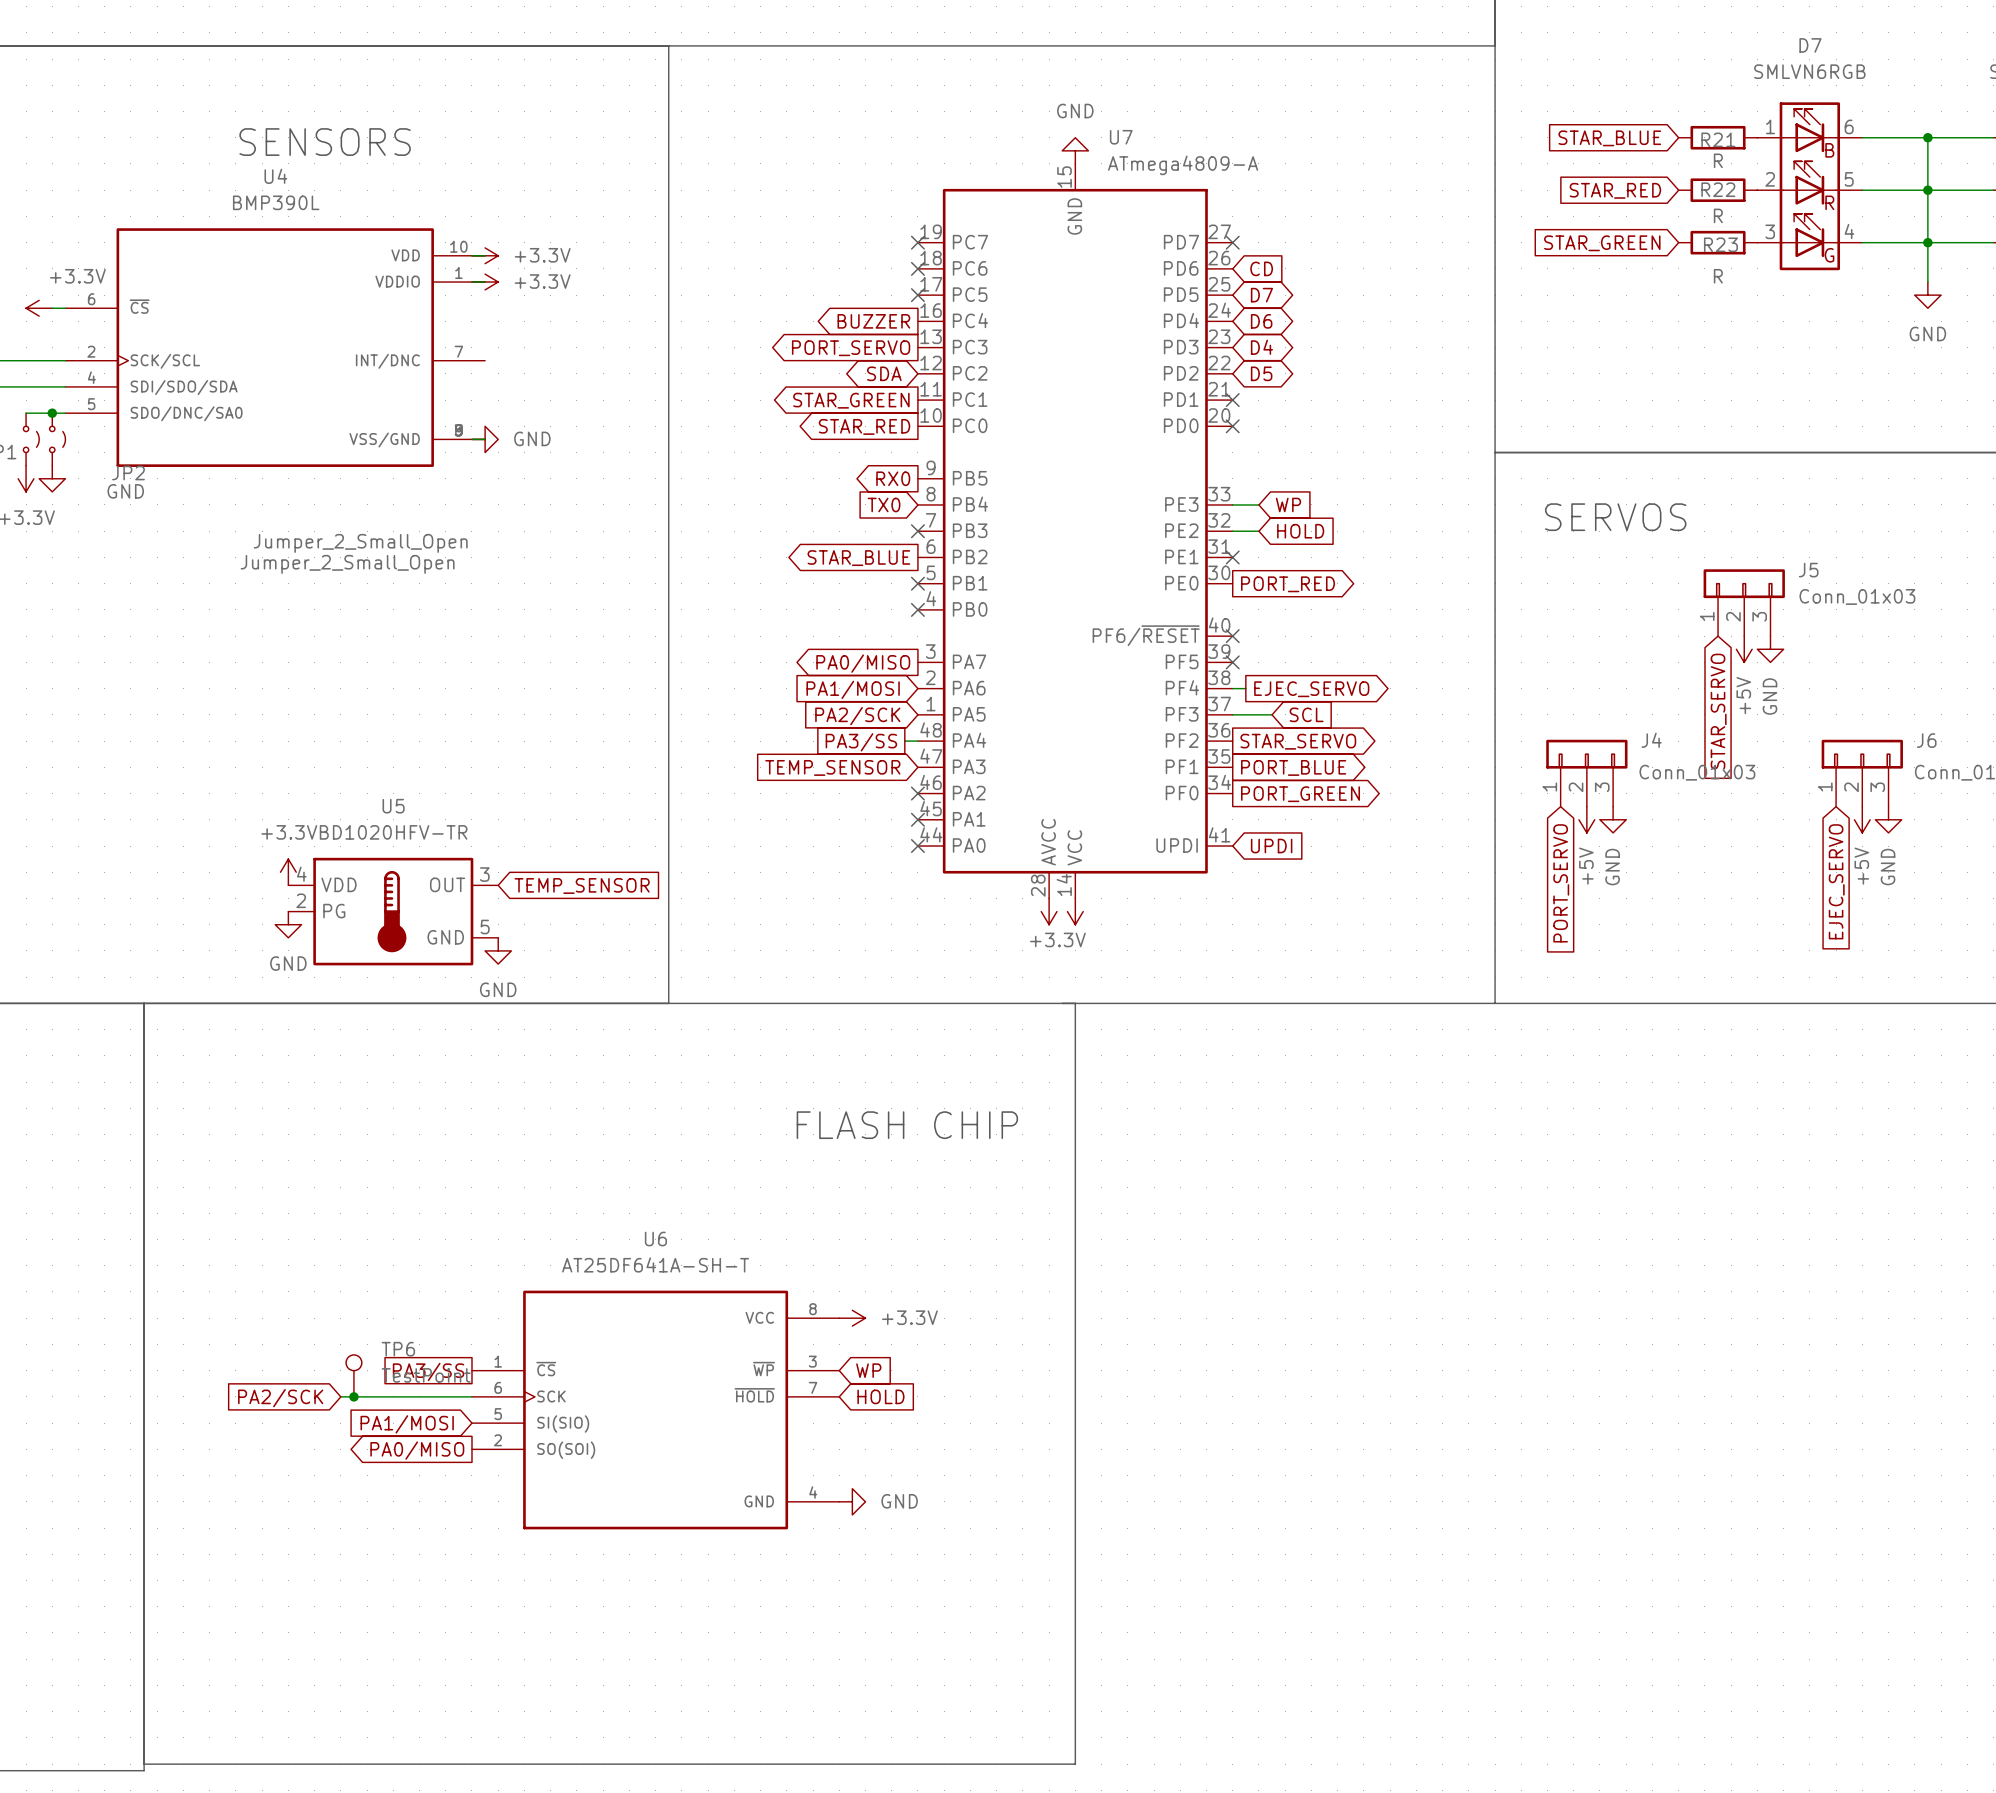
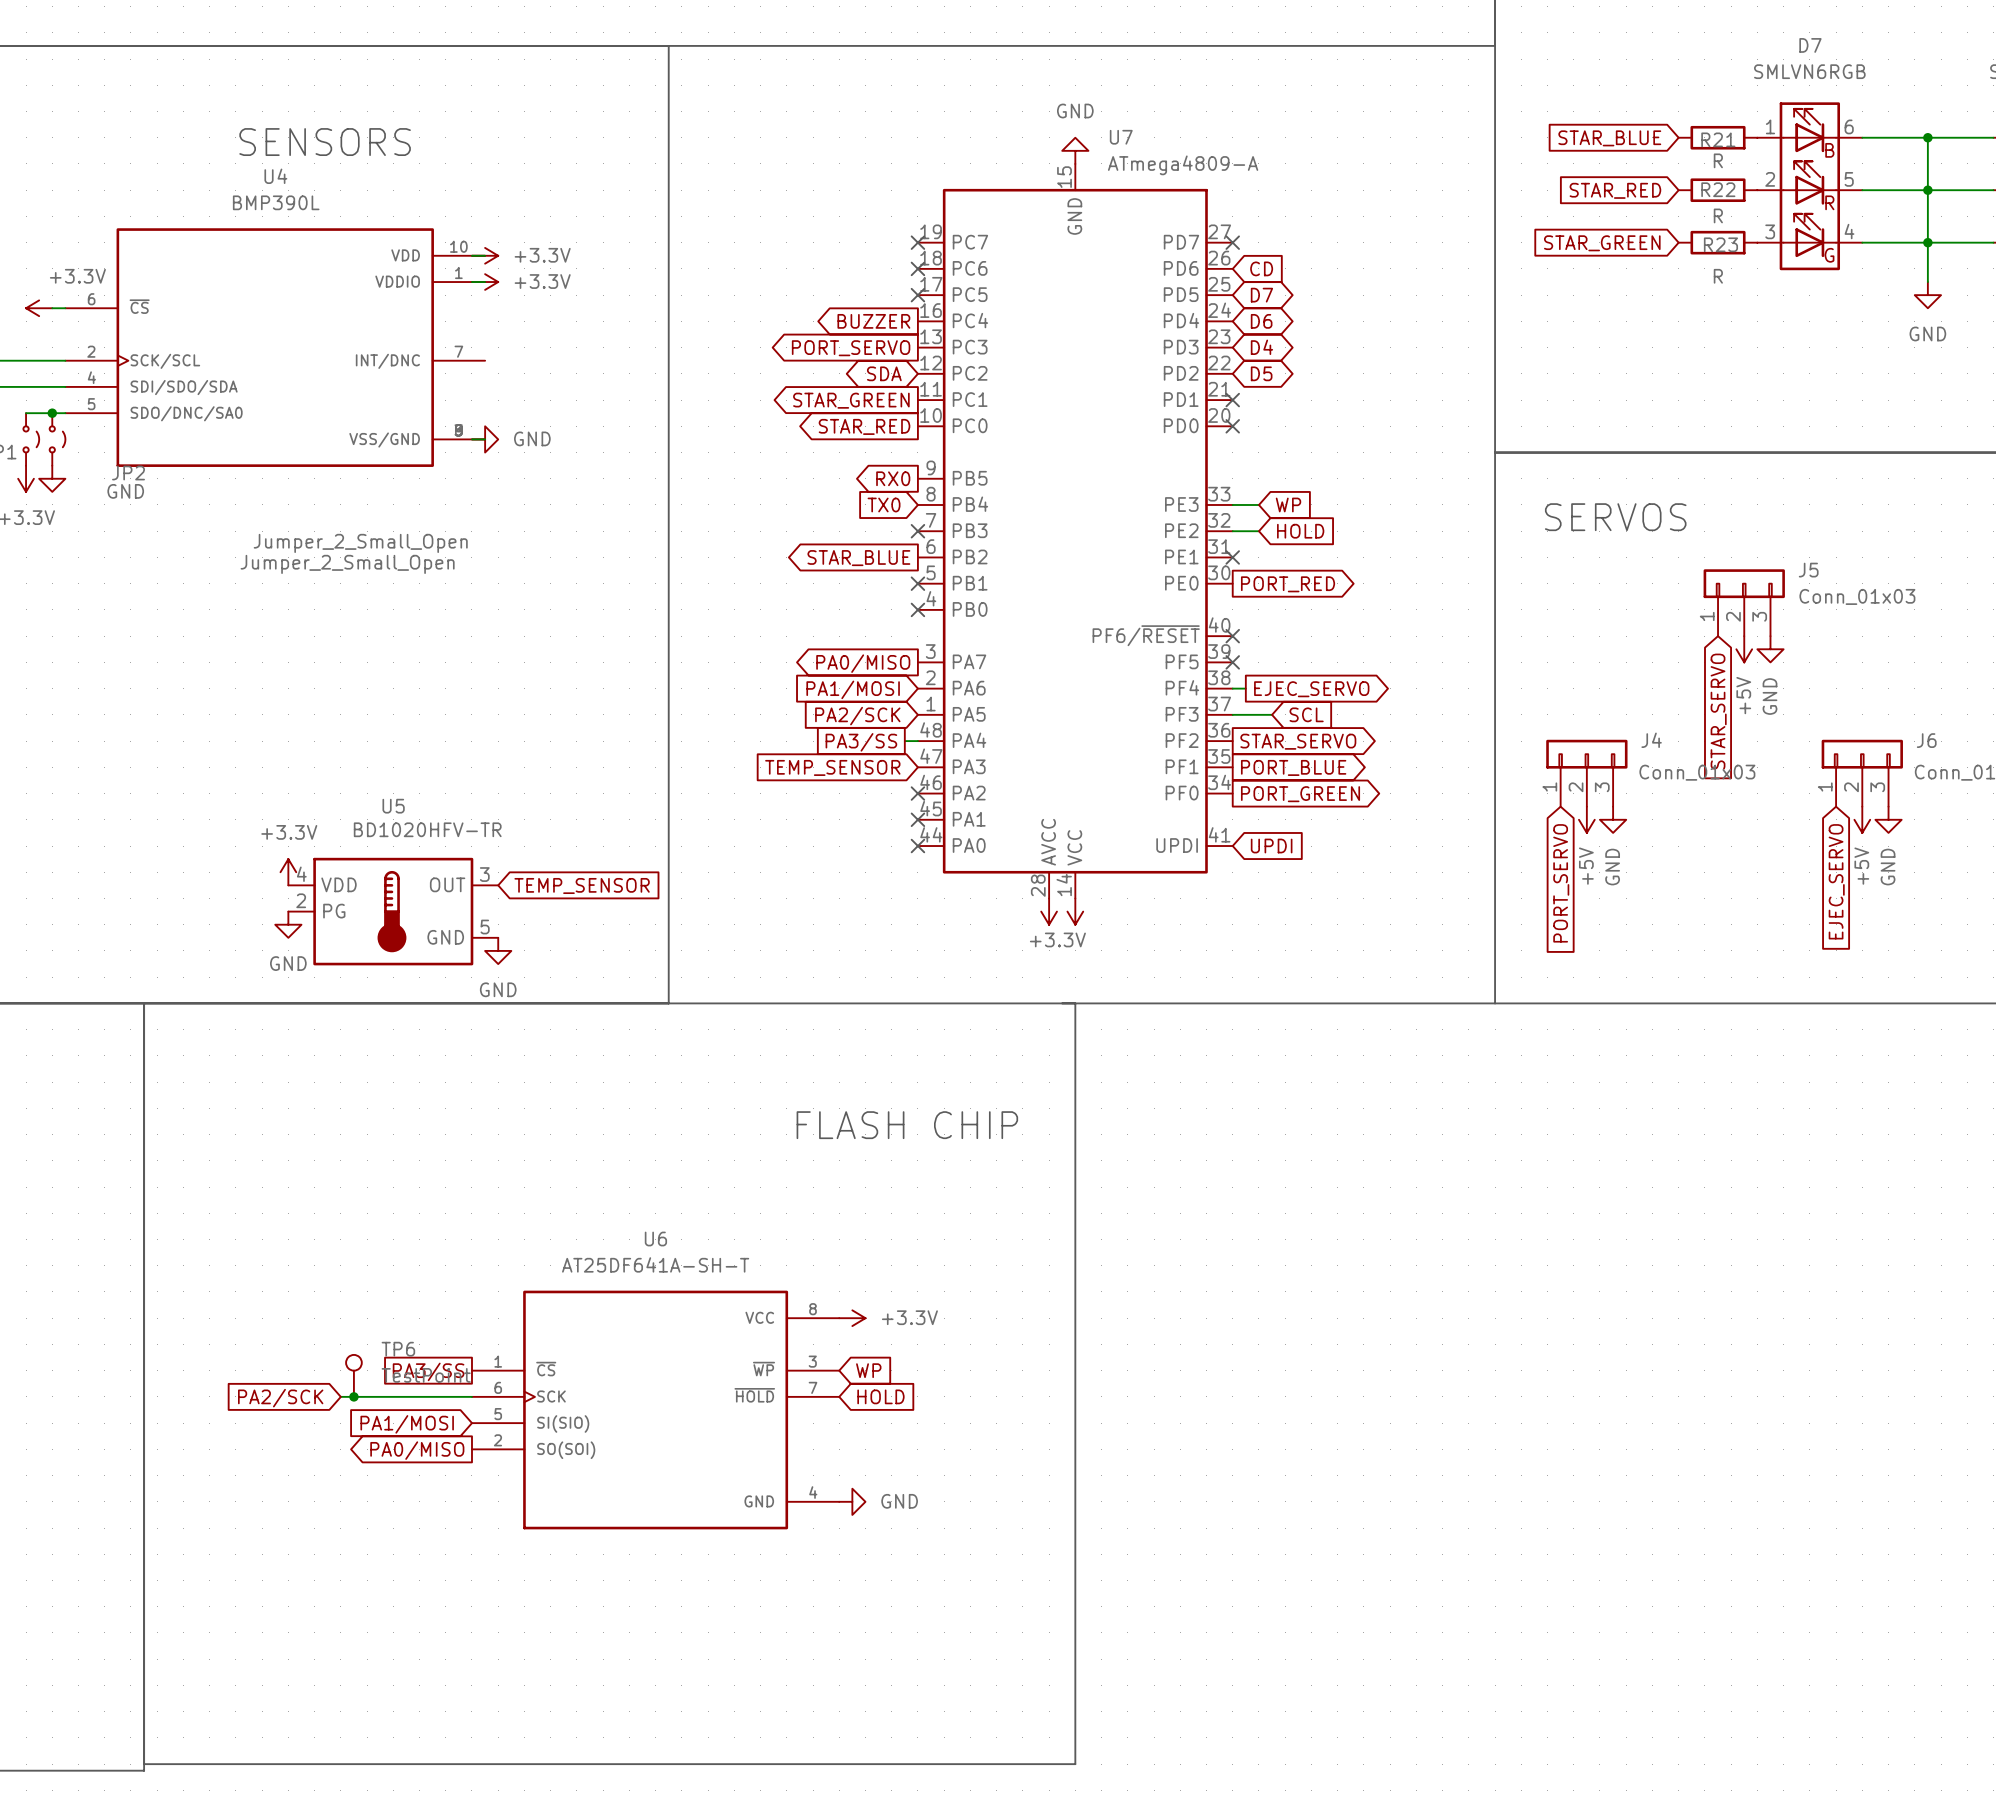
U5 value position: BD1020HFV-TR (393, 832) -> BD1020HFV-TR (427, 829)

